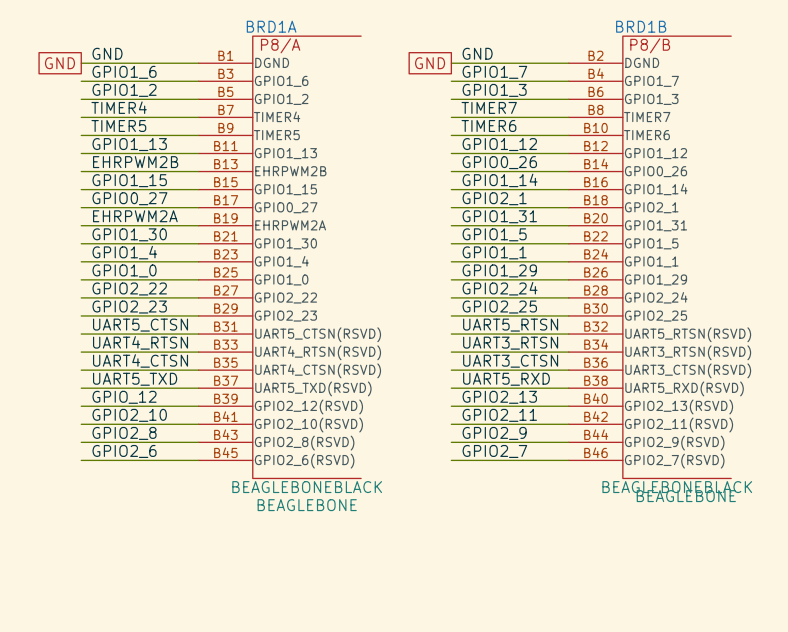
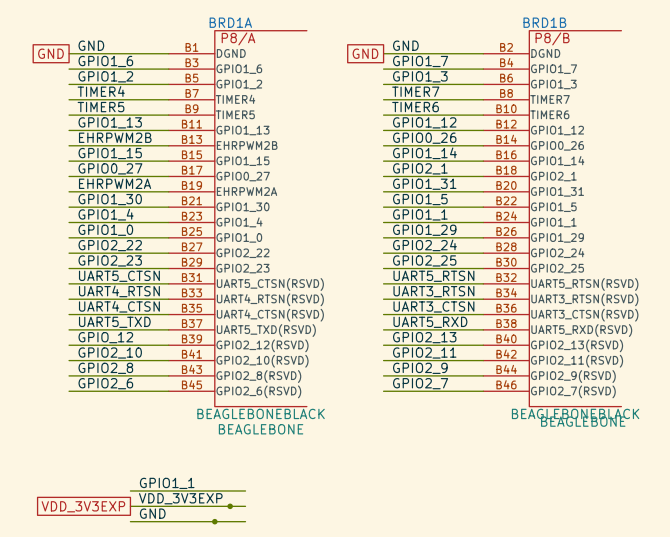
label: none -> GPIO1_1 (167, 483)
wire: none -> (130, 490) (245, 490)
label: none -> VDD_3V3EXP (180, 498)
wire: none -> (130, 506) (245, 506)
junction: none -> (230, 506)
global label: none -> VDD_3V3EXP (83, 506)
label: none -> GND (152, 513)
wire: none -> (130, 521) (245, 521)
junction: none -> (214, 521)

